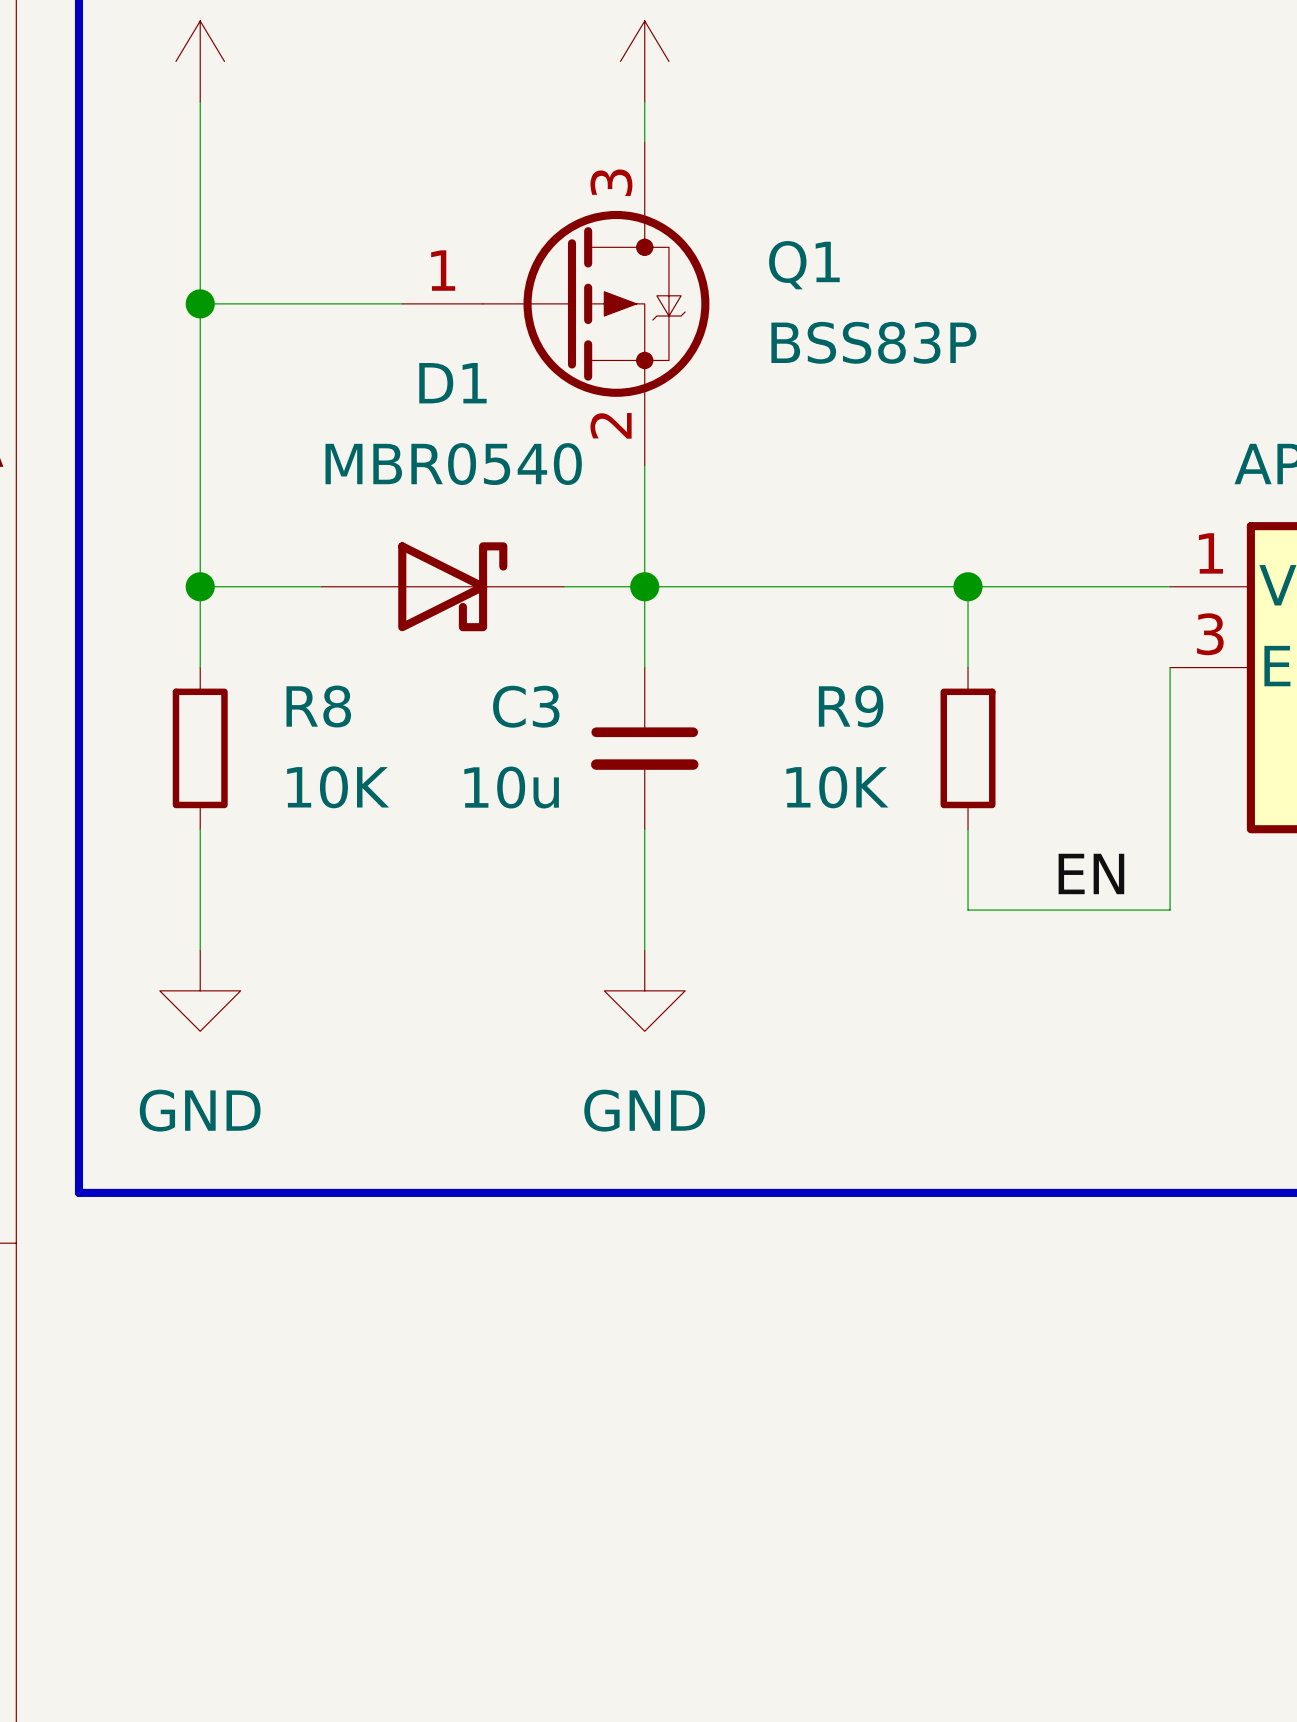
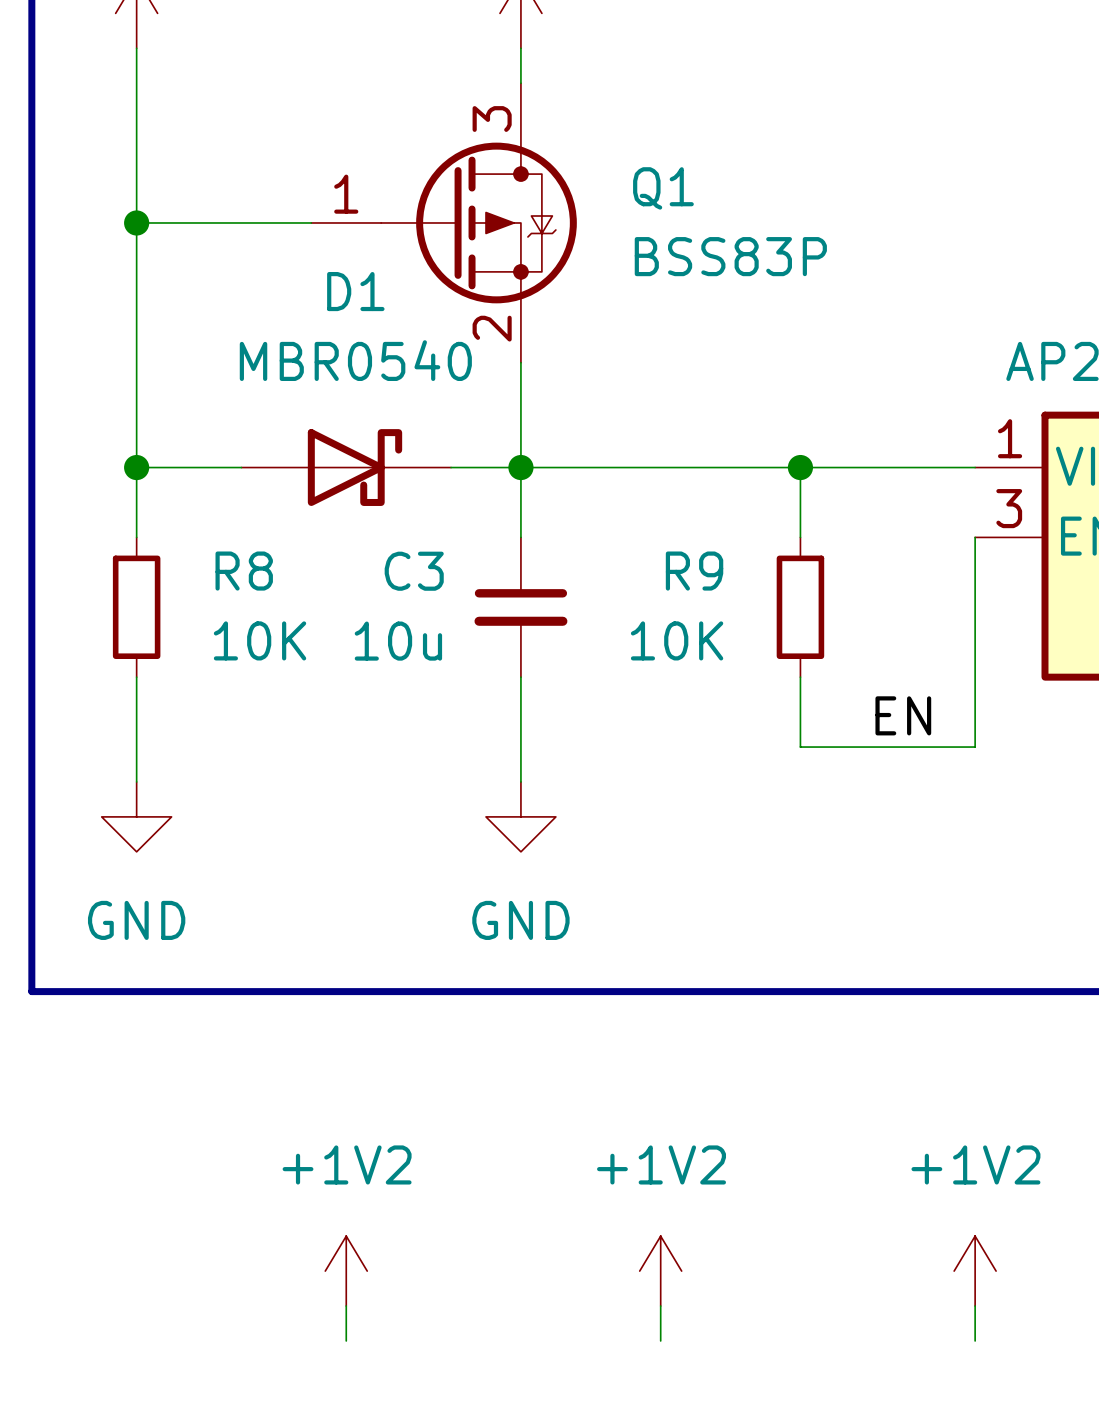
power symbol: none -> +1V2 (346, 1271)
power symbol: none -> +1V2 (660, 1271)
power symbol: none -> +1V2 (975, 1271)
wire: none -> (346, 1306) (346, 1340)
wire: none -> (660, 1306) (660, 1340)
wire: none -> (975, 1306) (975, 1340)

